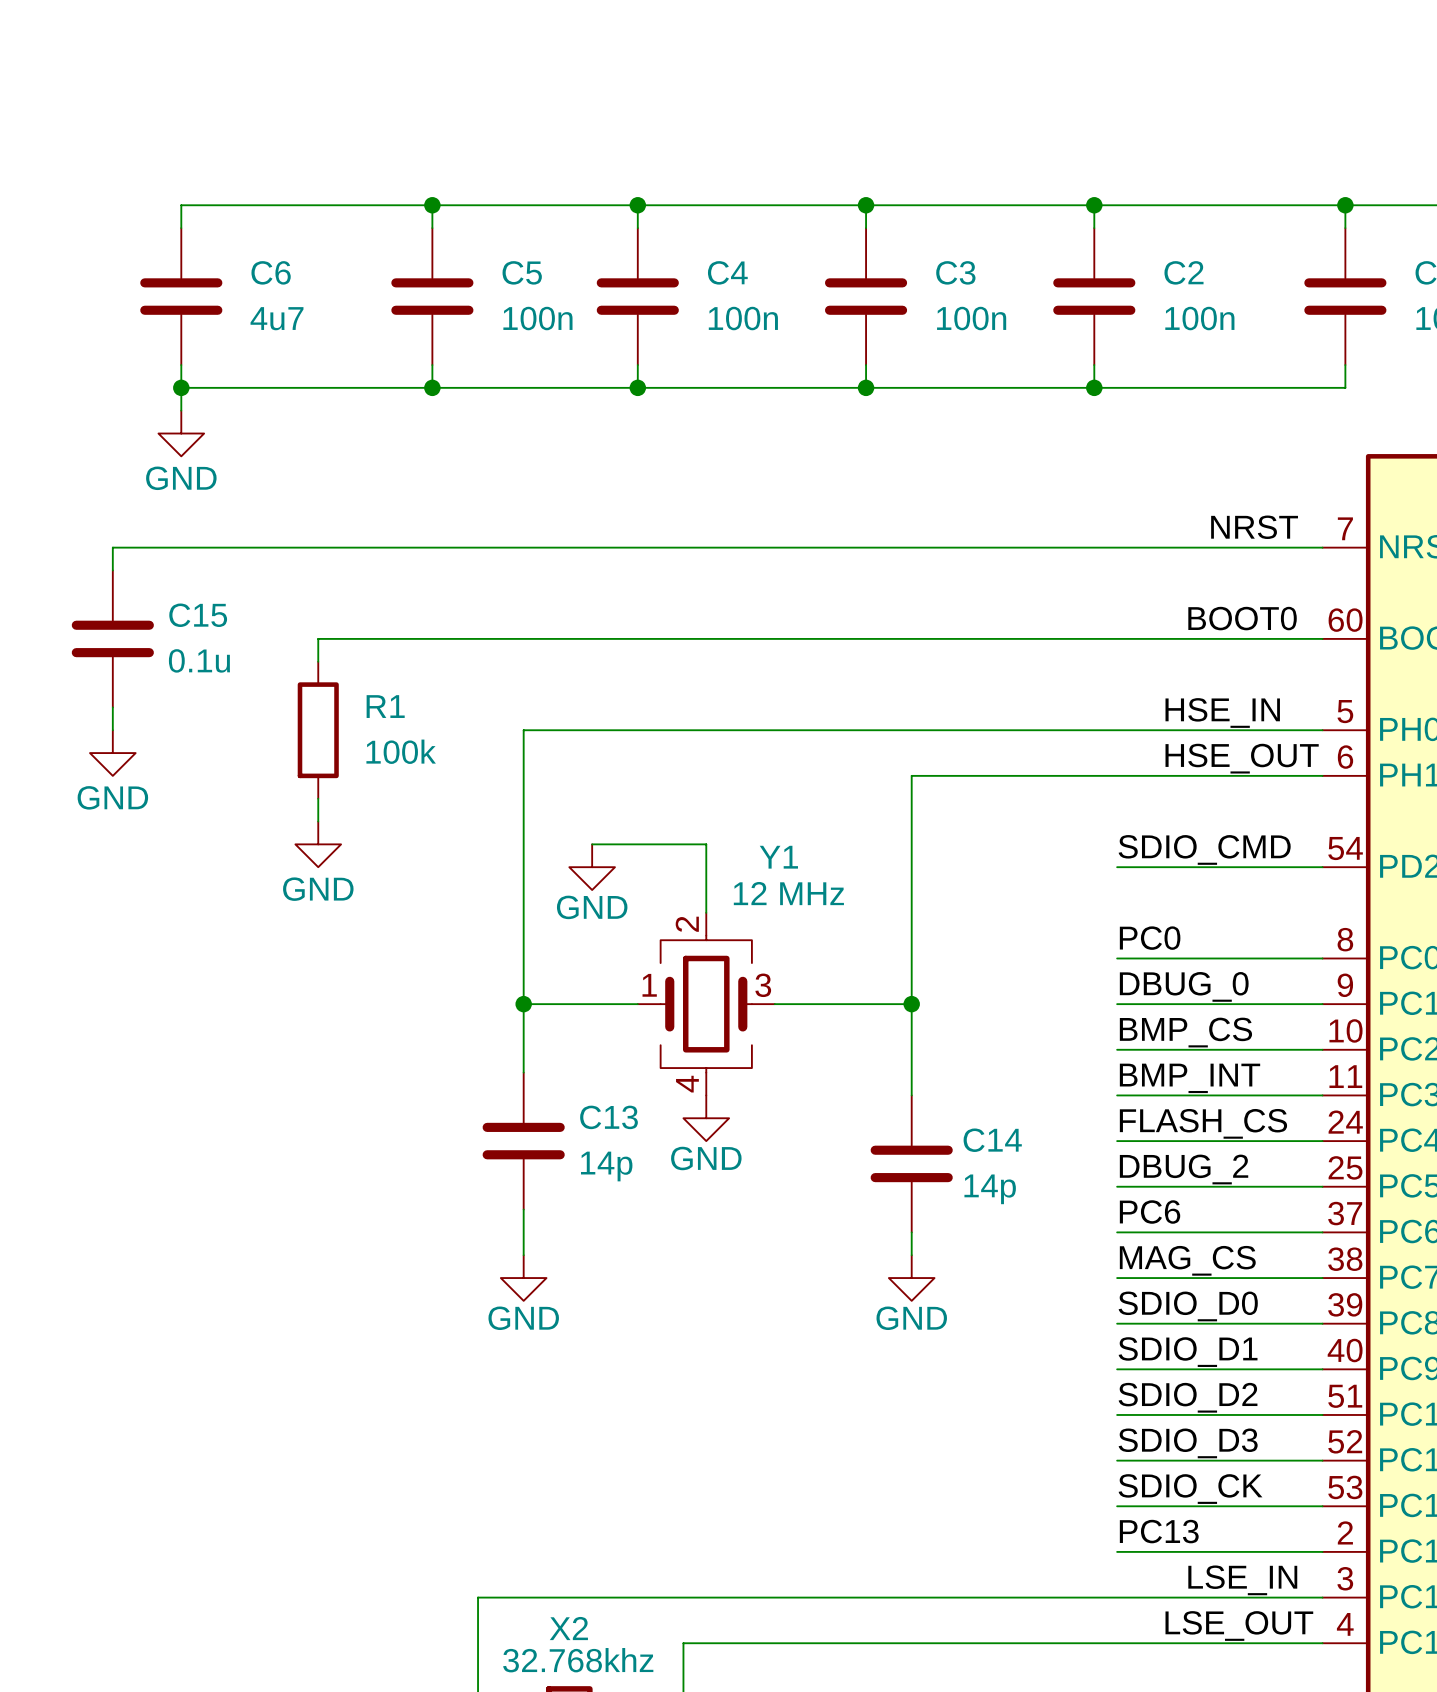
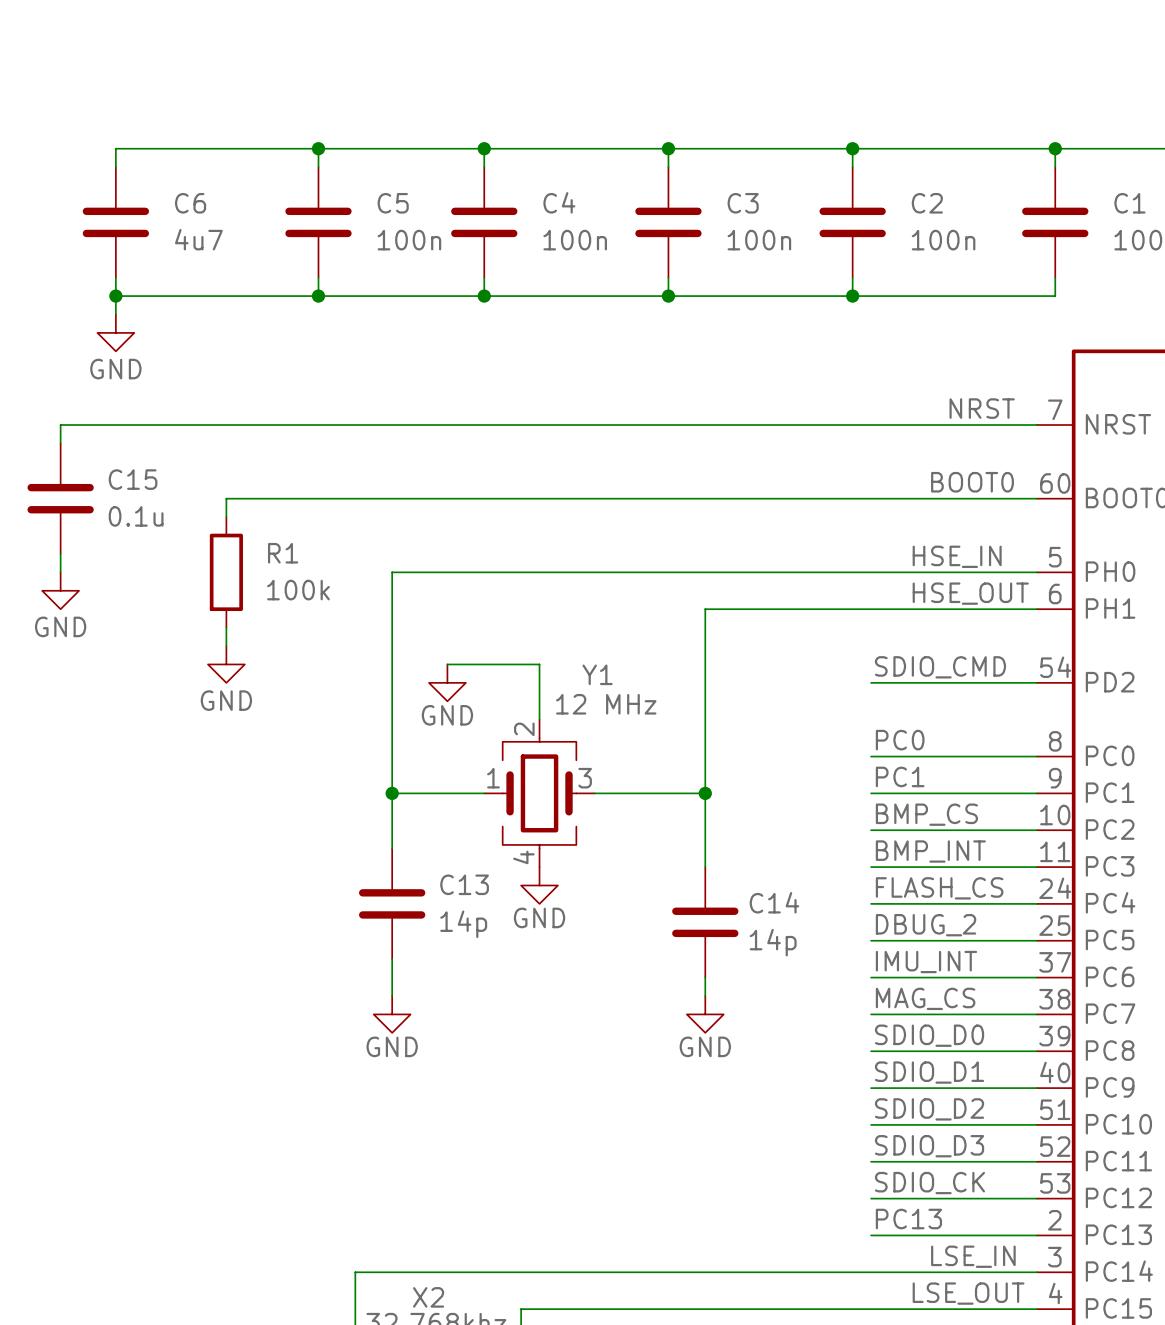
label: DBUG_0 (1184, 986) -> PC1 (900, 776)
label: PC6 (1150, 1212) -> IMU_INT (926, 962)

